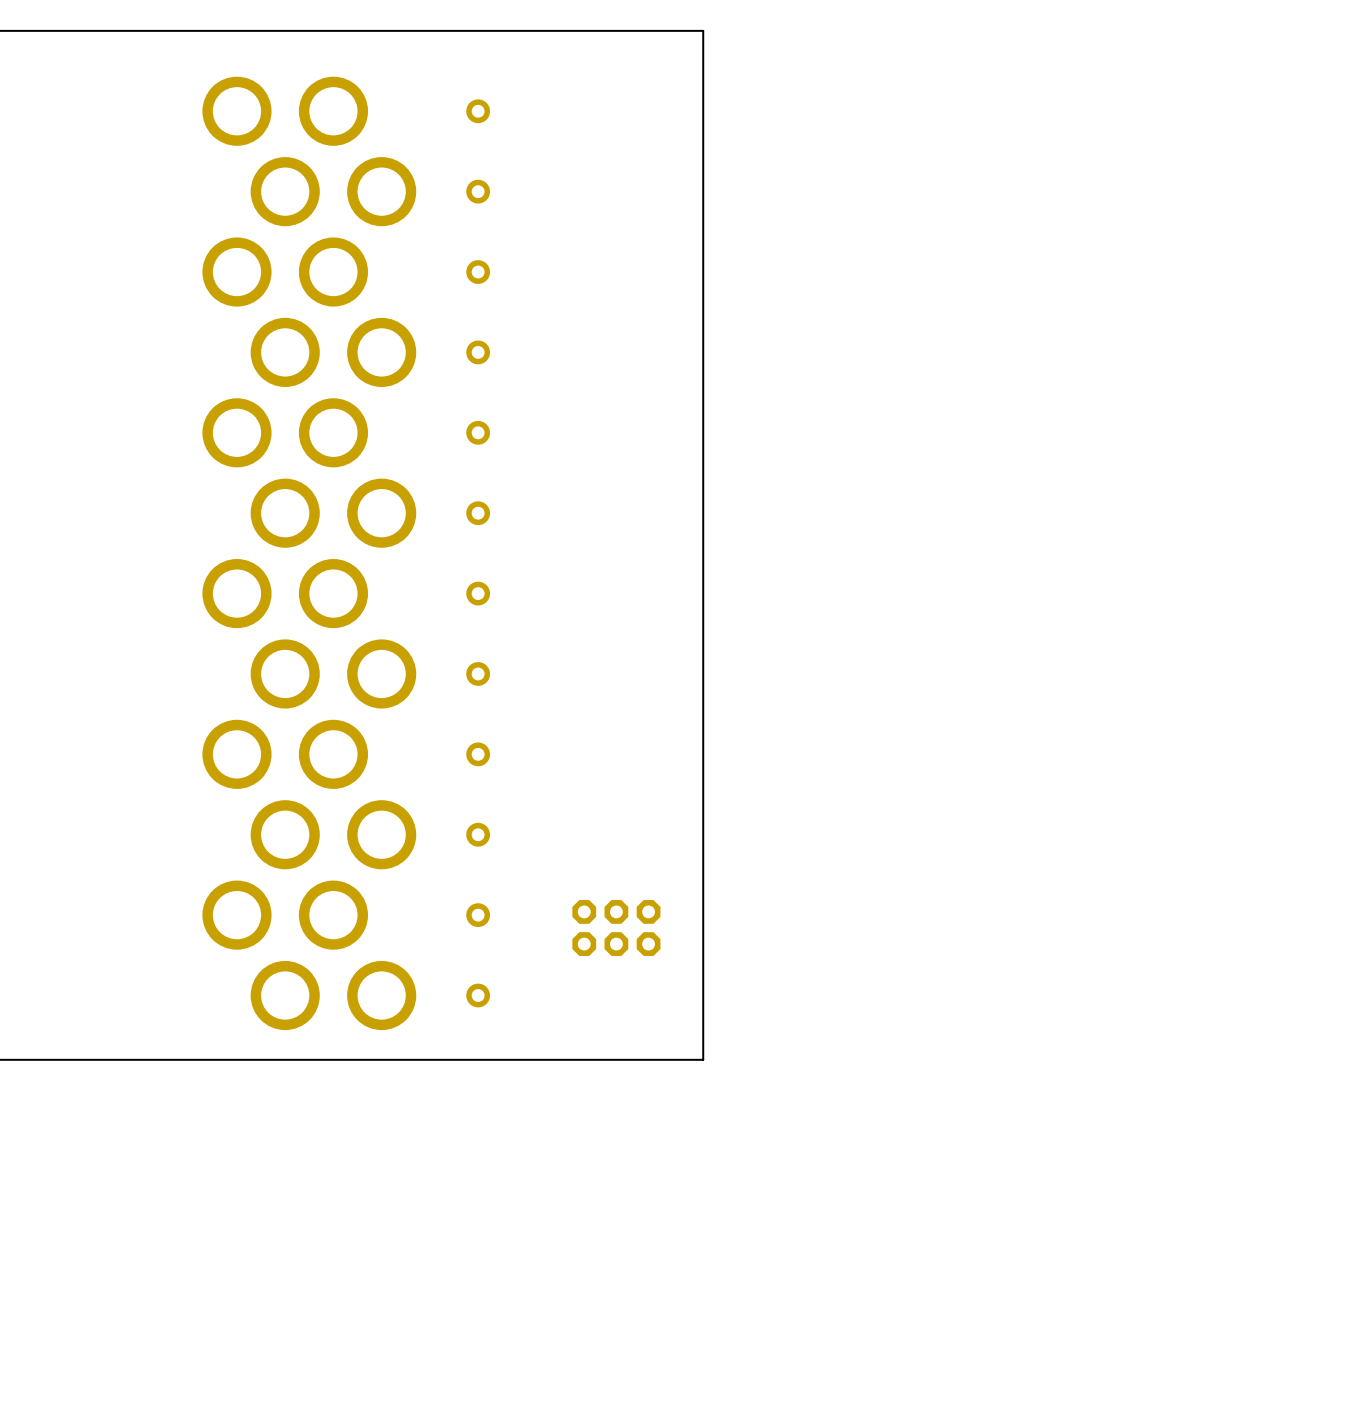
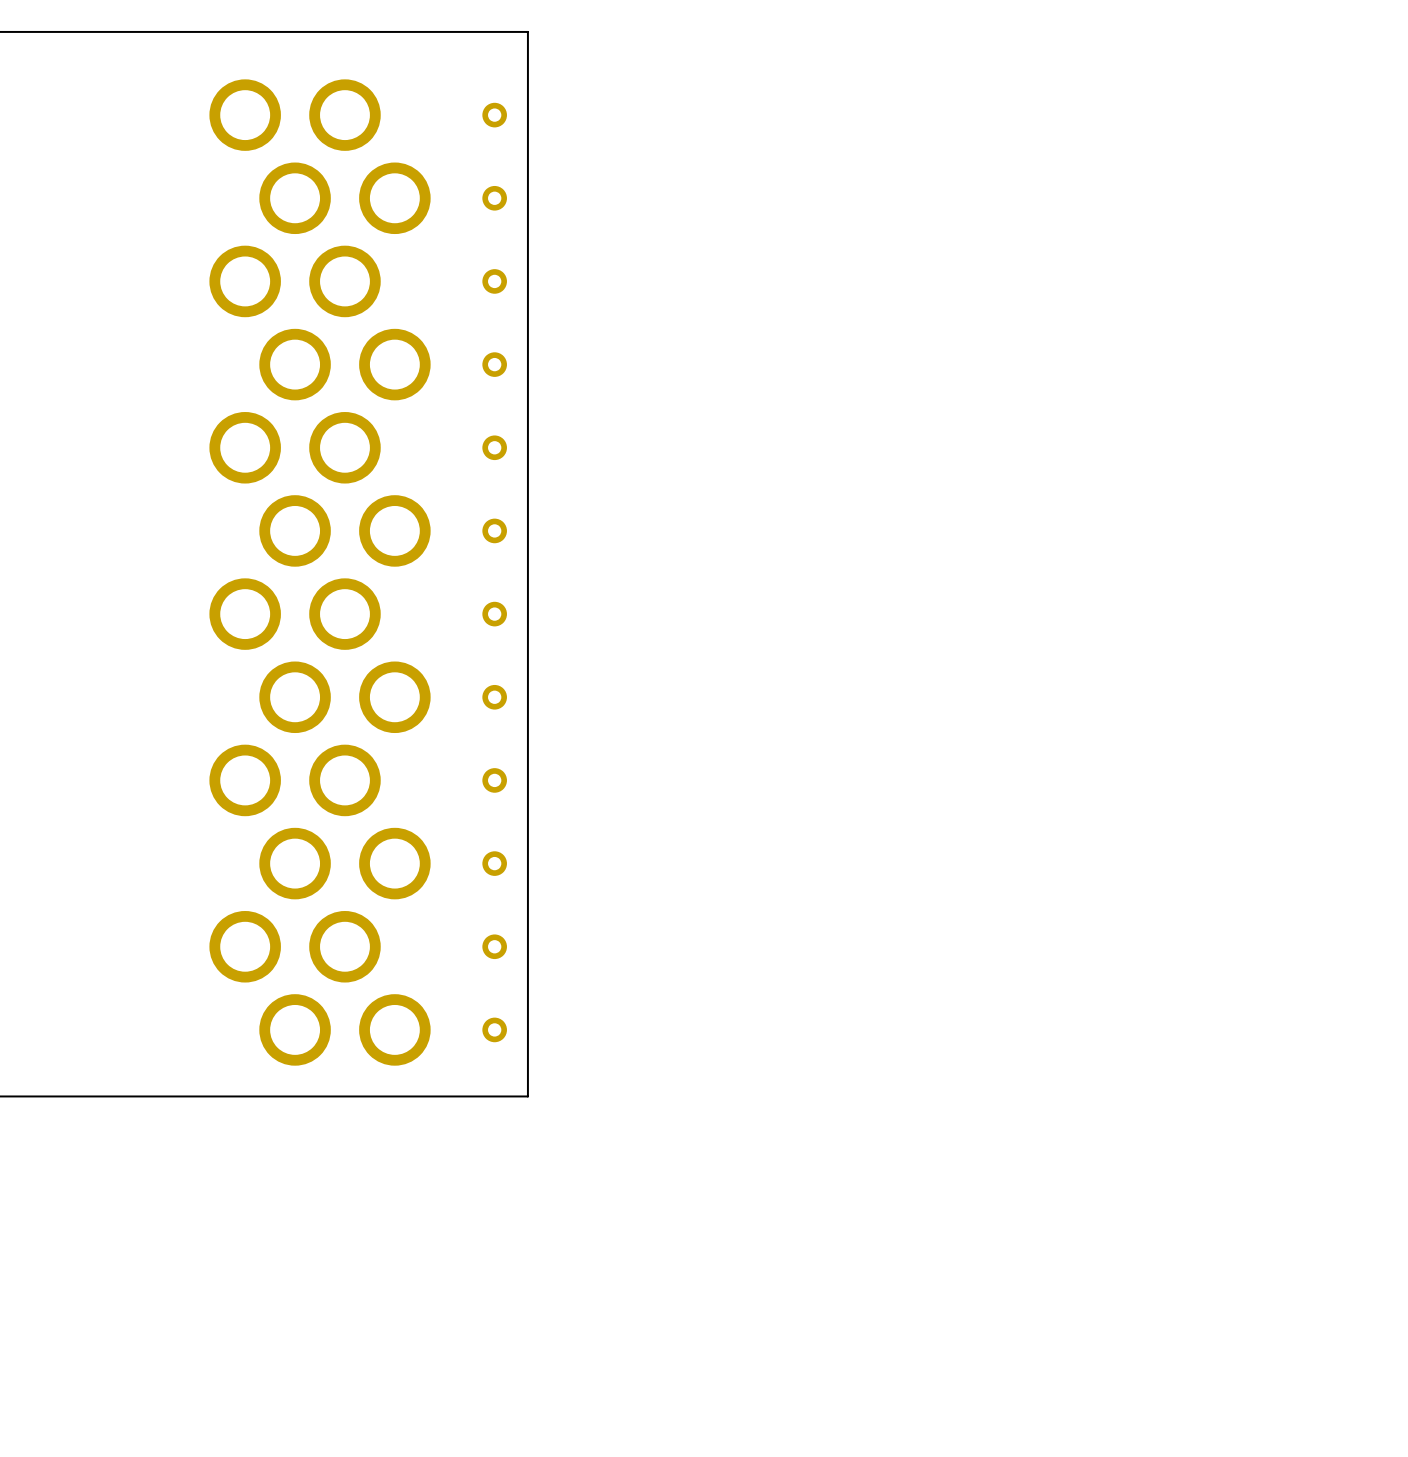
board edge: (510, 30) (703, 30) (703, 1059) (510, 1059) -> (527, 31) (527, 1096)
part: (616, 927) -> none

